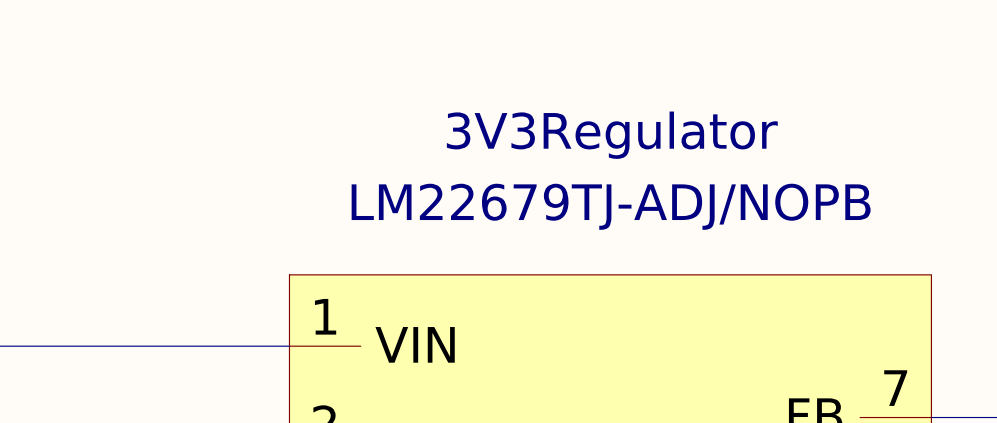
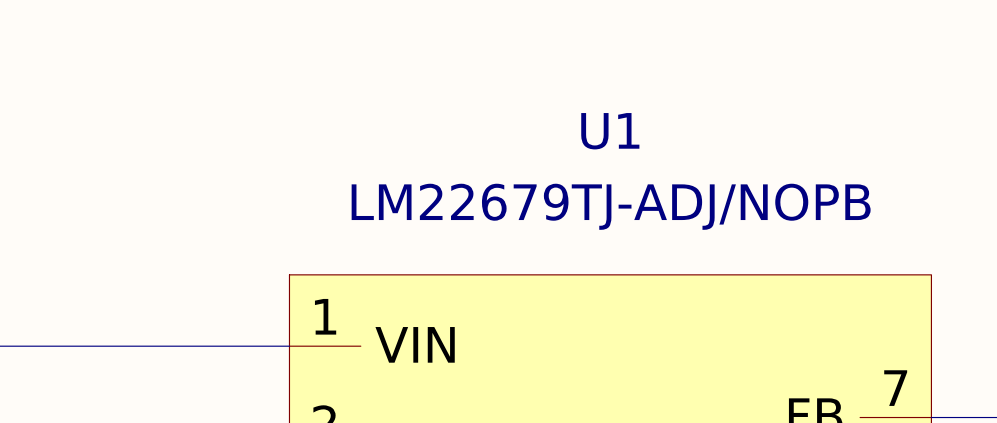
3V3Regulator name: 3V3Regulator (612, 135) -> U1 (610, 131)

